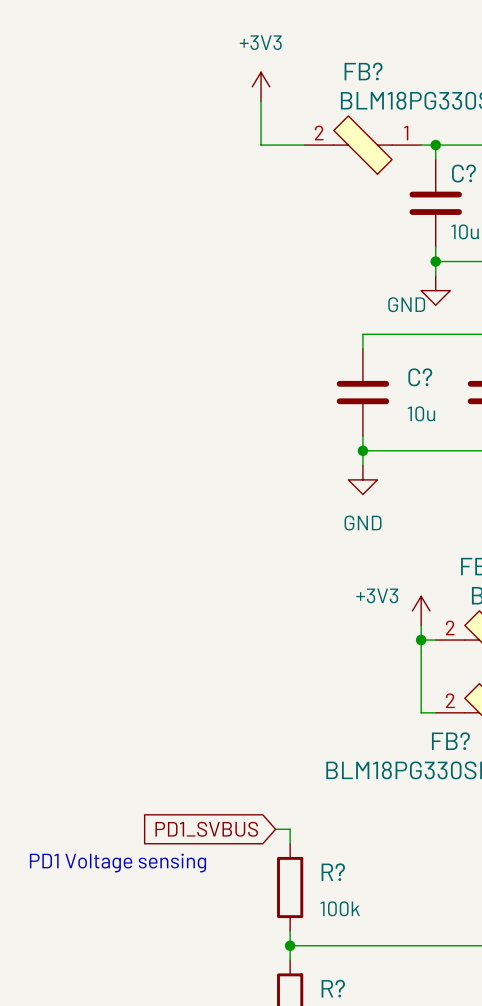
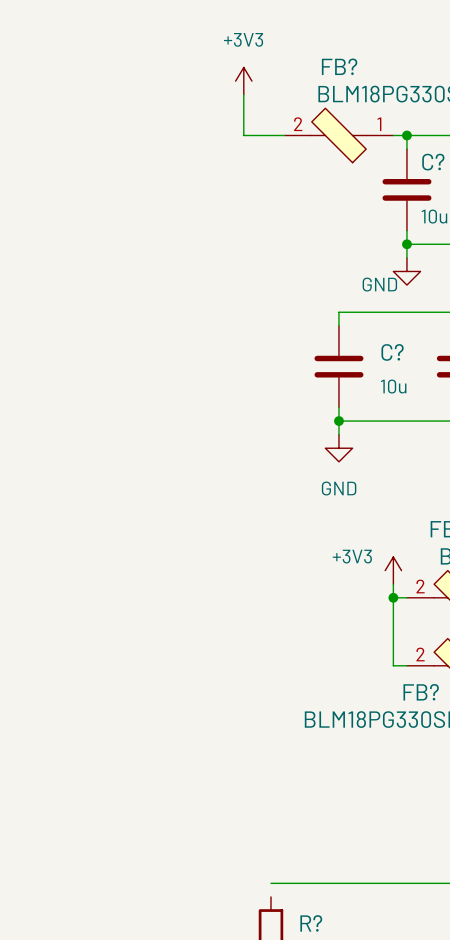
global label: PD1_SVBUS (206, 829) -> none
wire: (275, 829) (290, 829) (290, 843) -> none
text: PD1 Voltage sensing (117, 863) -> none
R?: (290, 887) -> none
wire: (290, 931) (290, 960) -> none
junction: (290, 945) -> none

